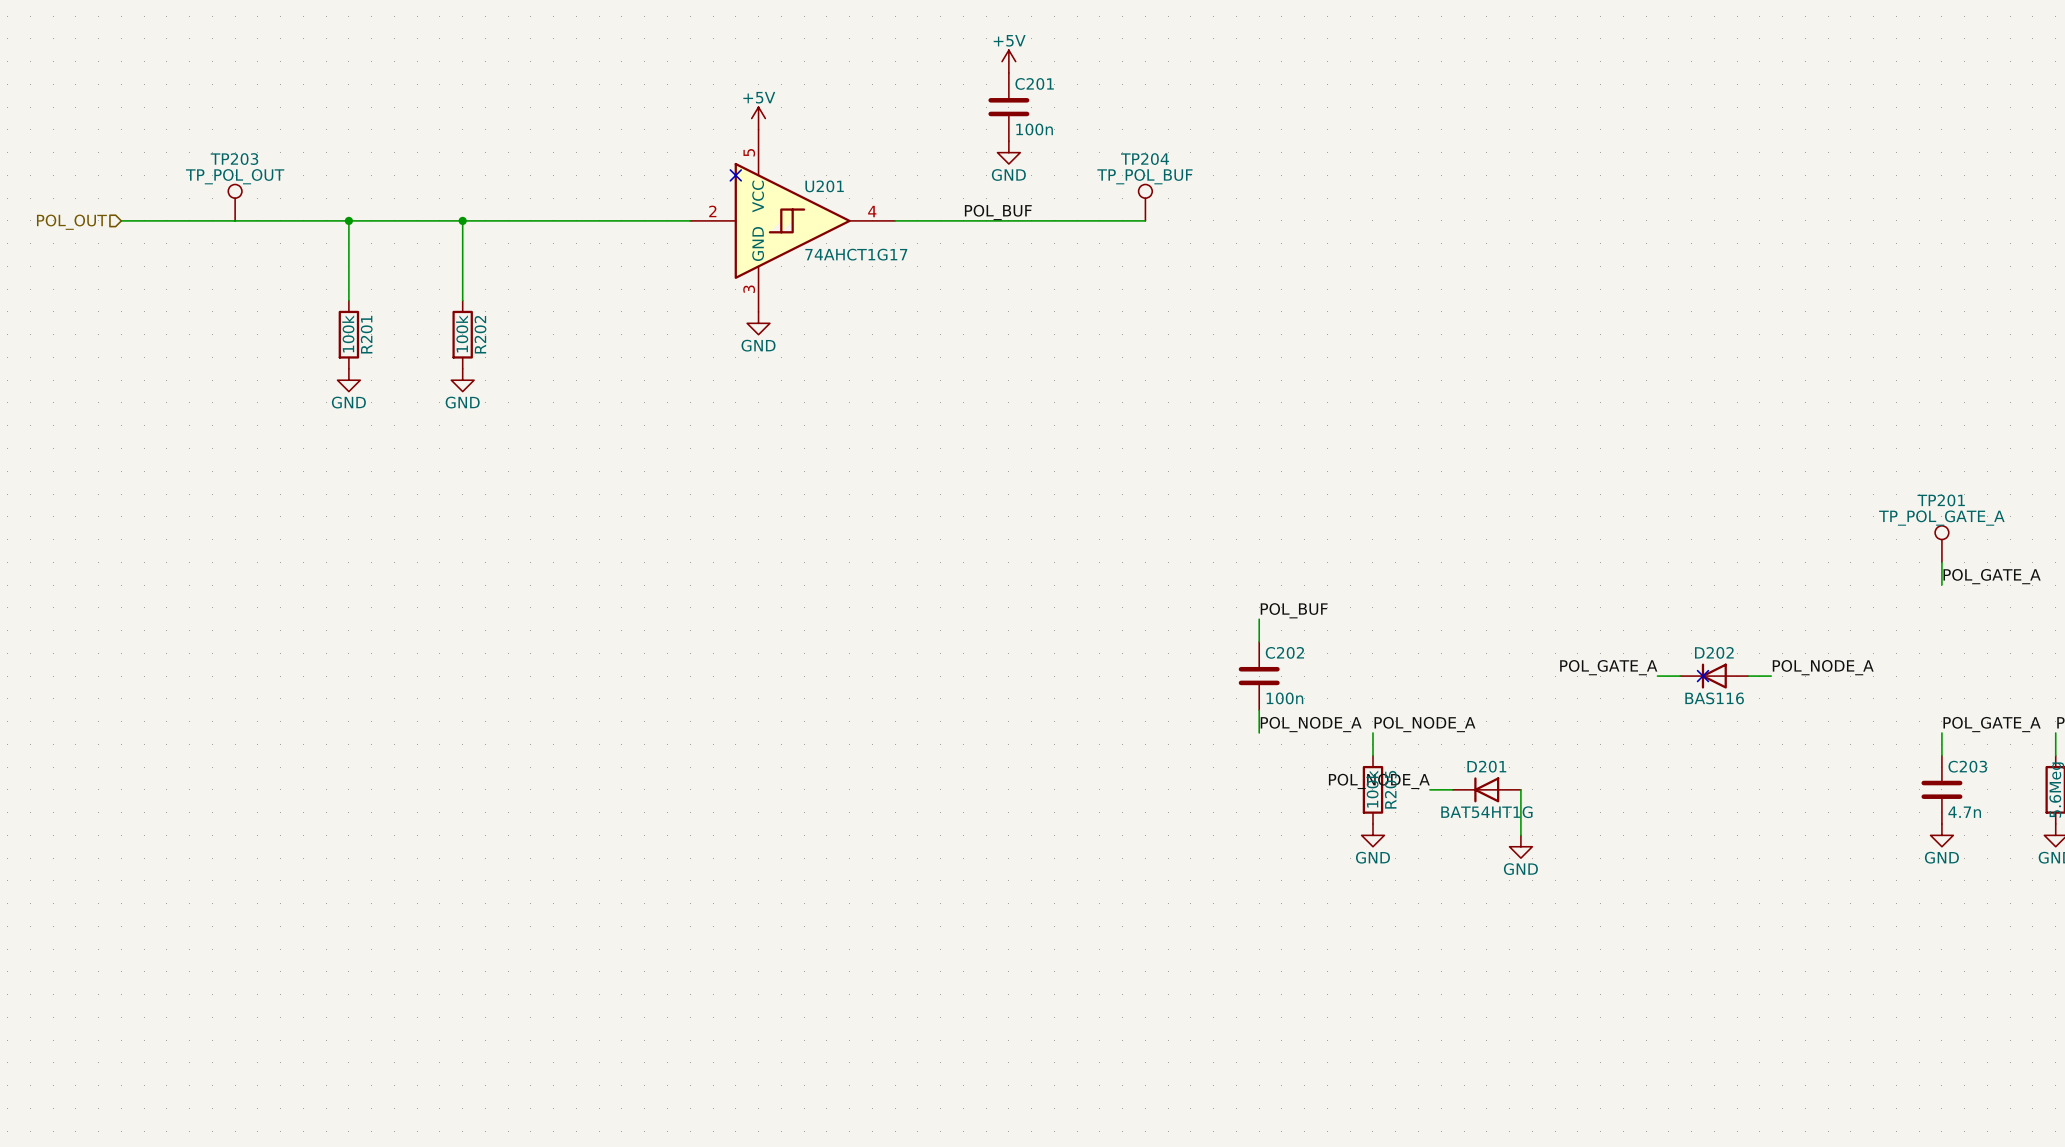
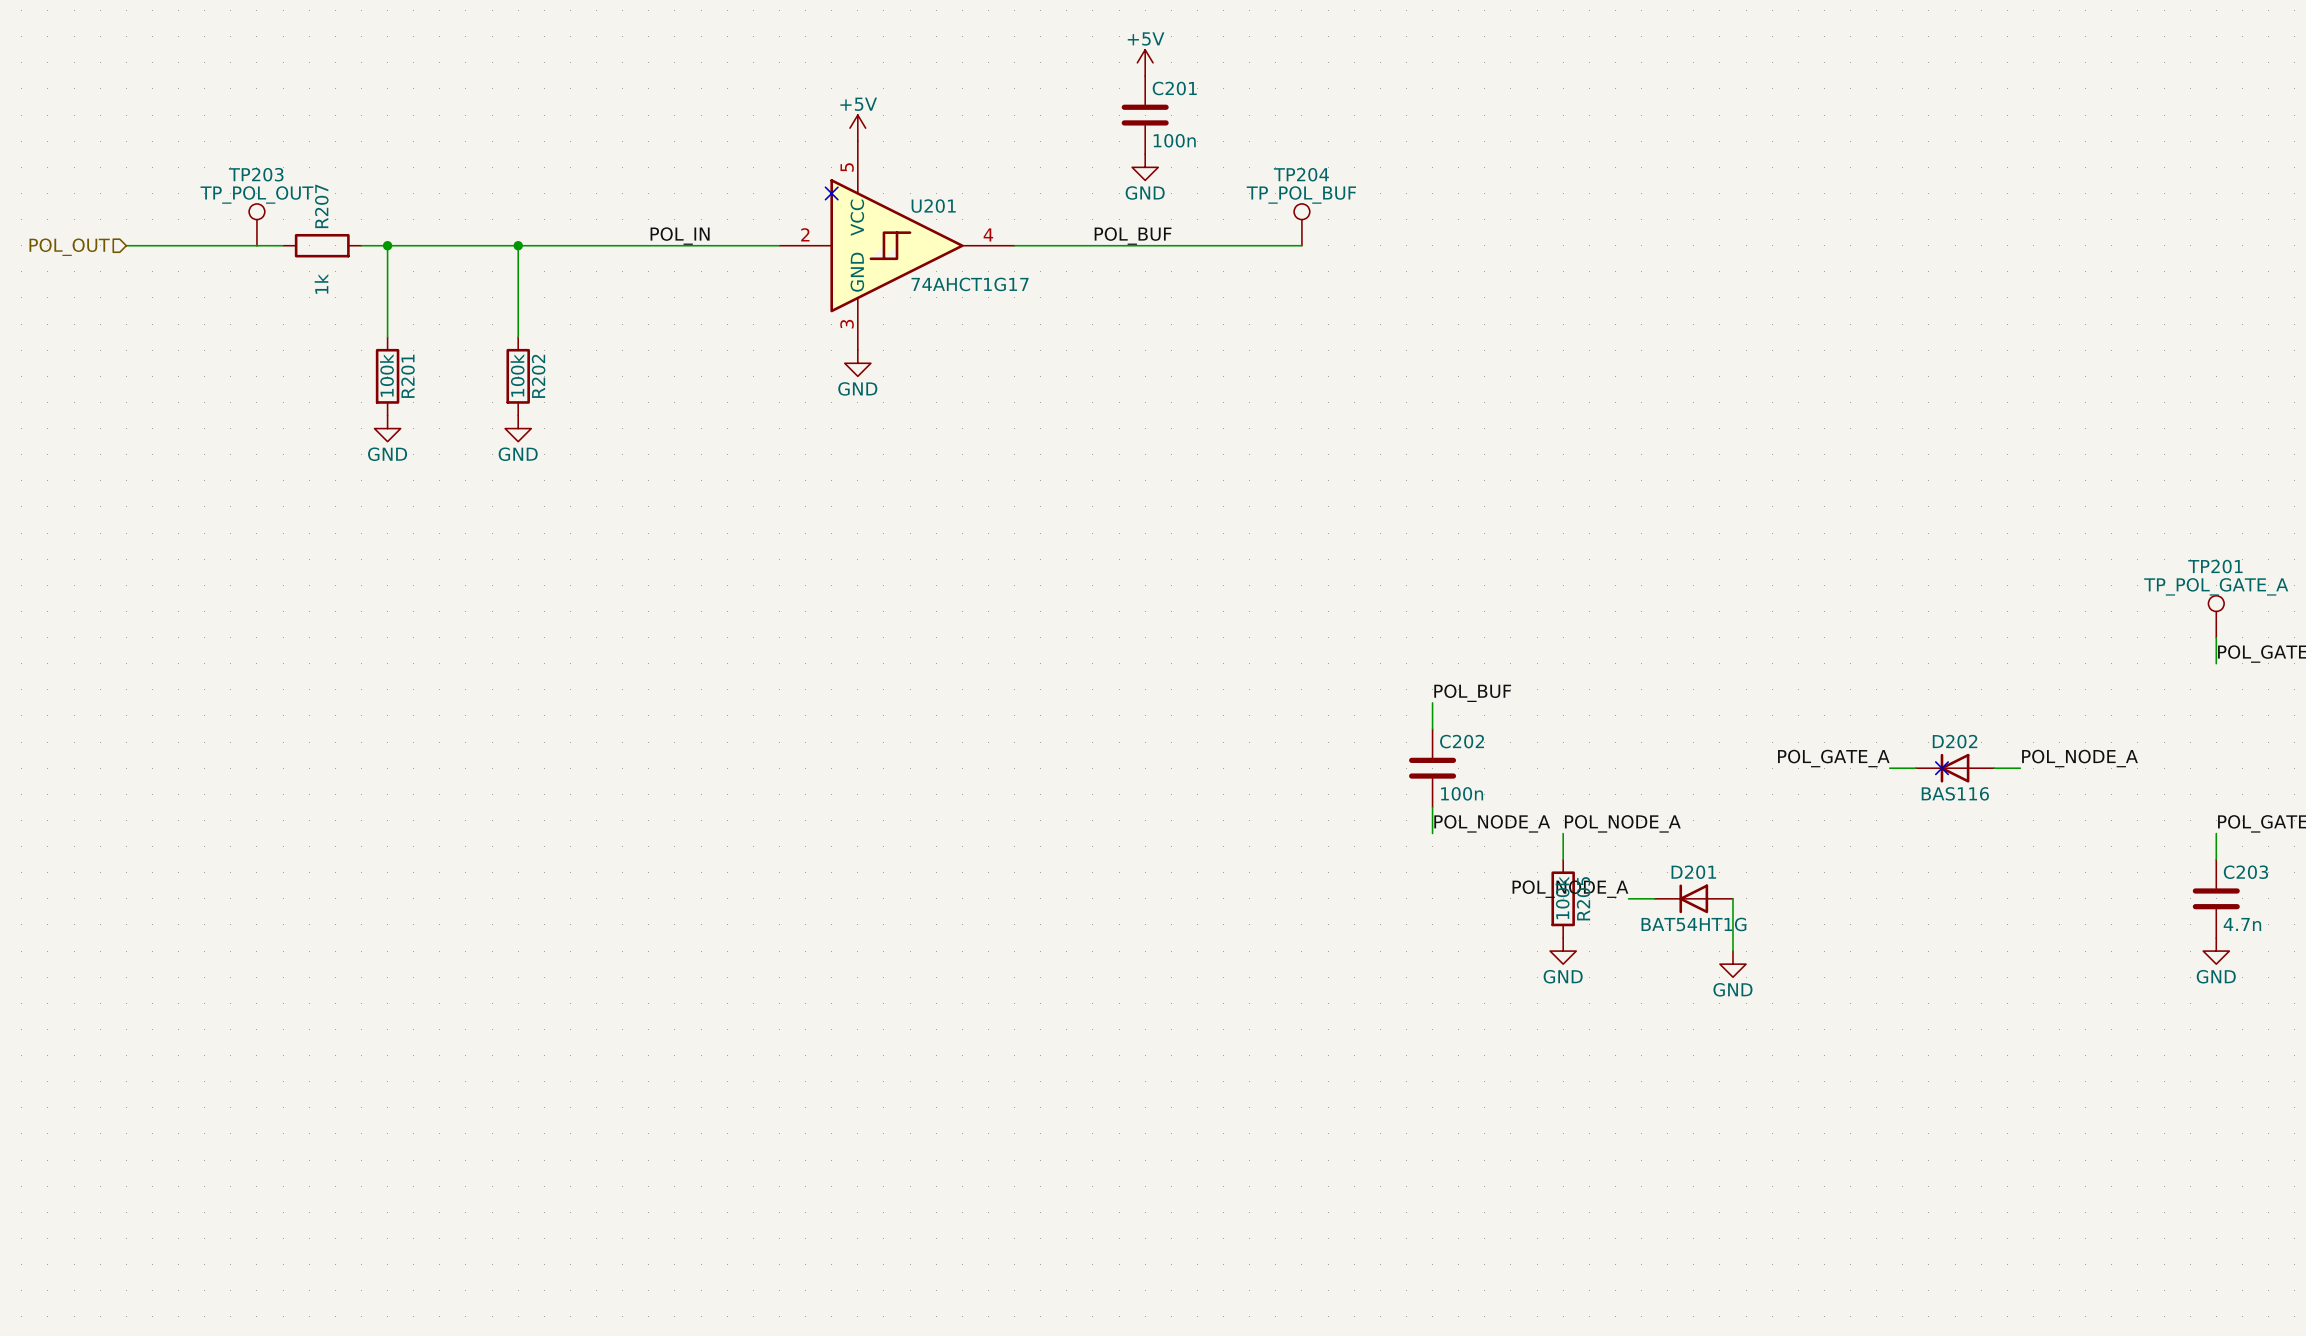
label: none -> POL_IN (680, 236)
wire: (257, 220) (326, 220) -> none
R207: none -> 1k (322, 245)

